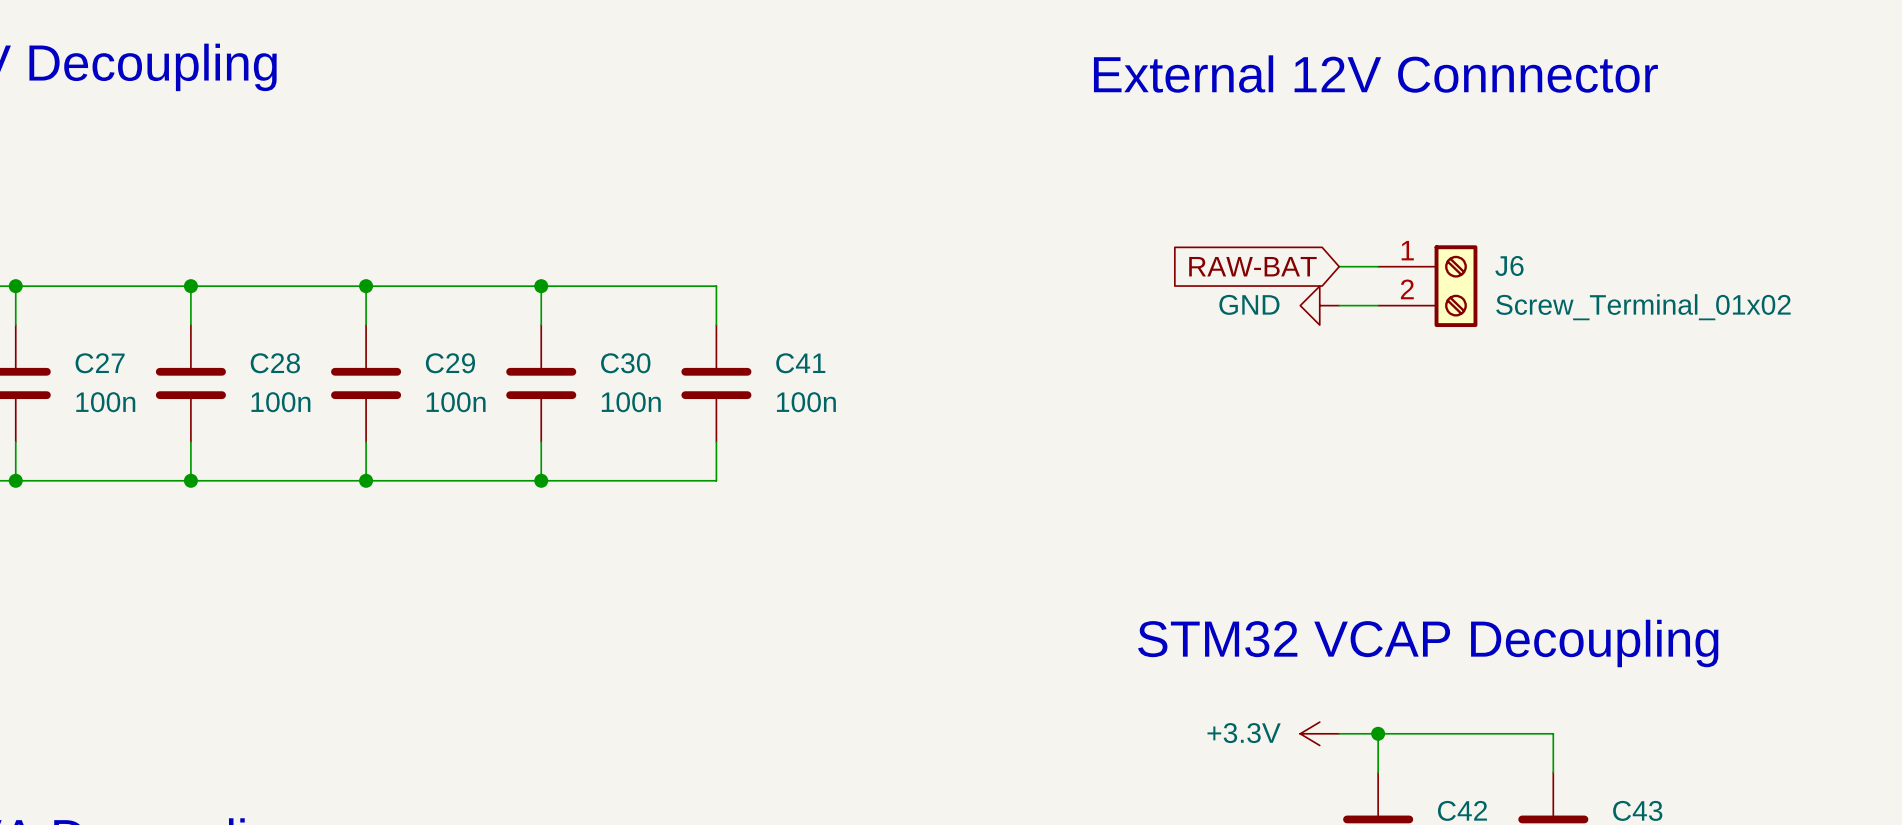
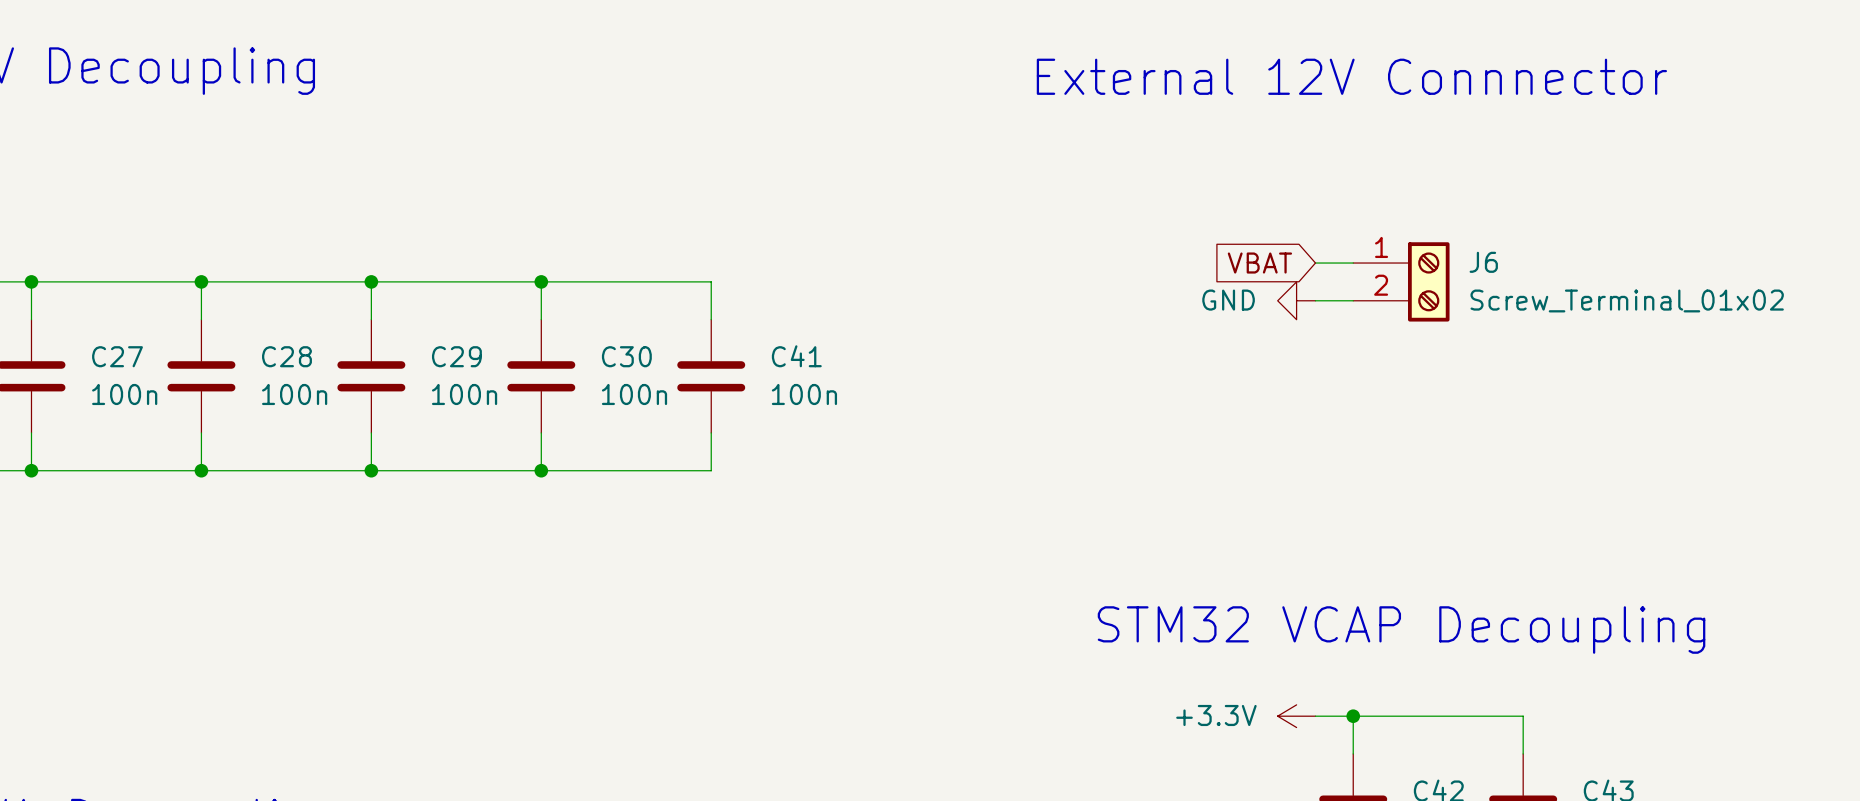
global label: RAW-BAT (1252, 266) -> VBAT (1259, 263)

